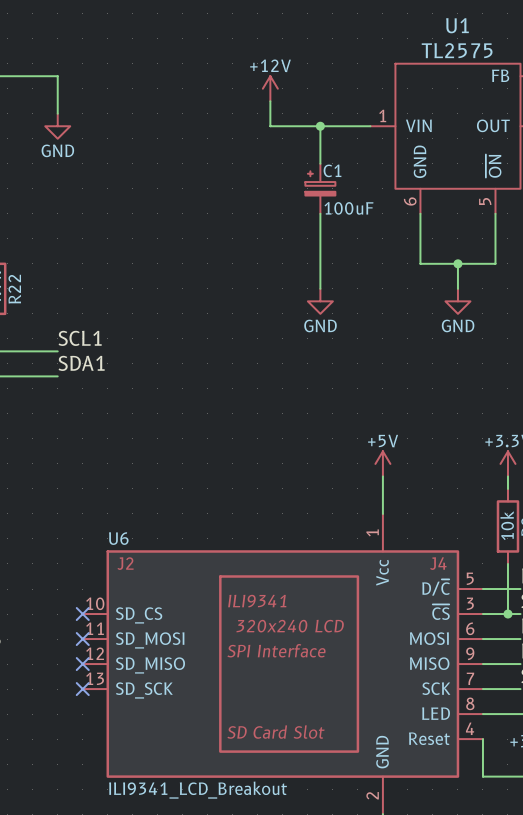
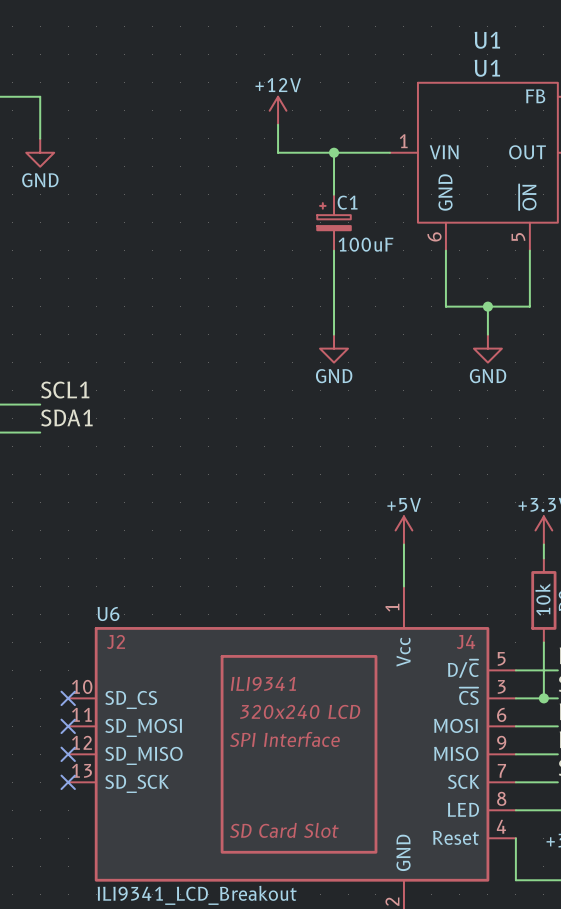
U1 value: TL2575 (457, 50) -> U1 (487, 68)

